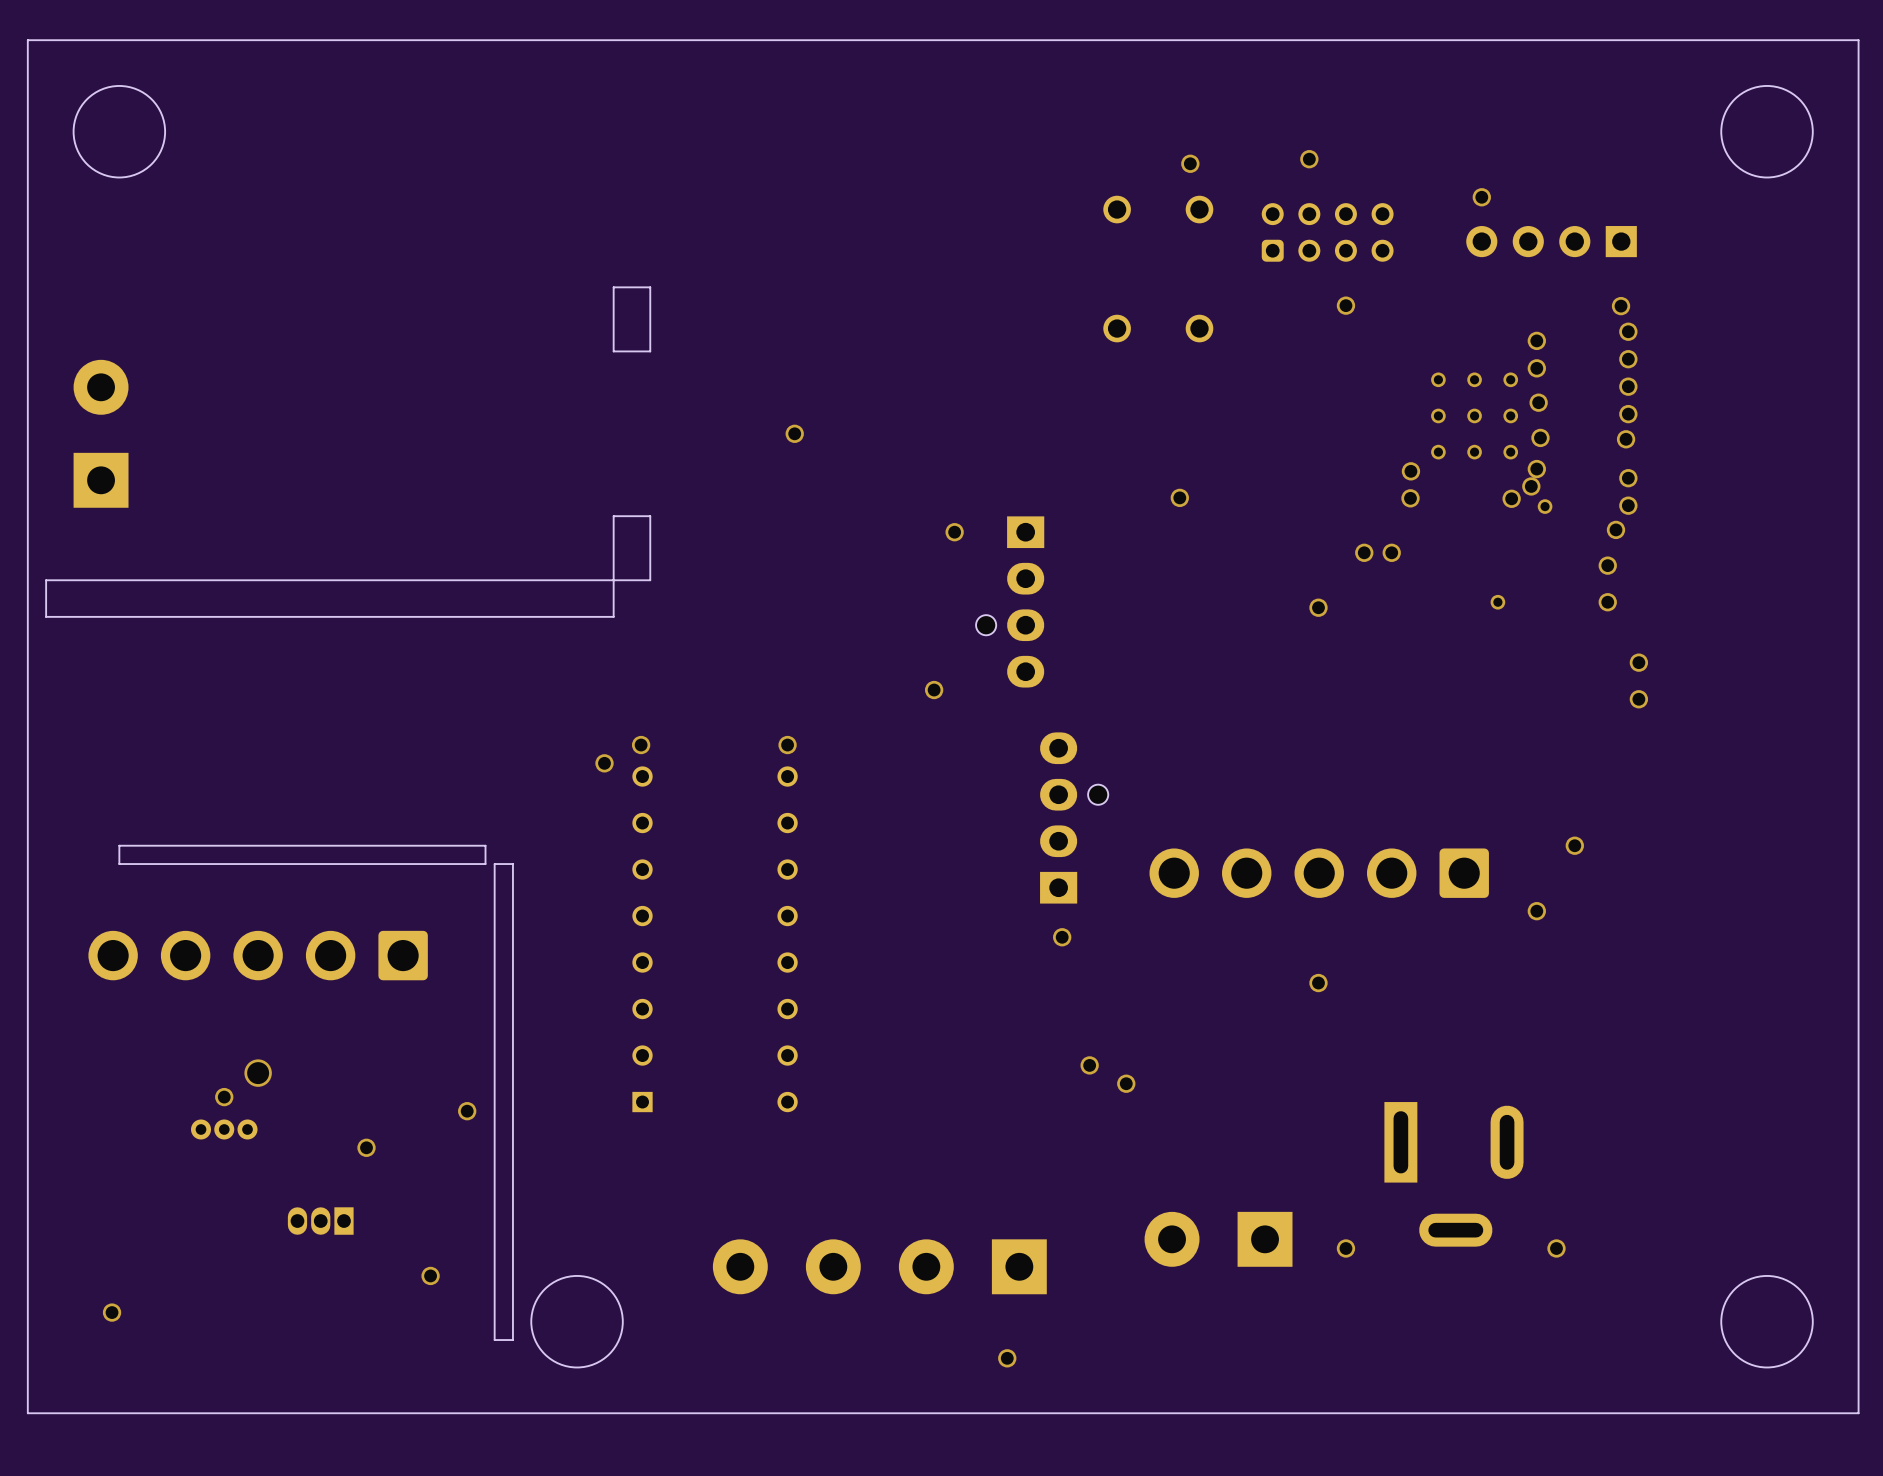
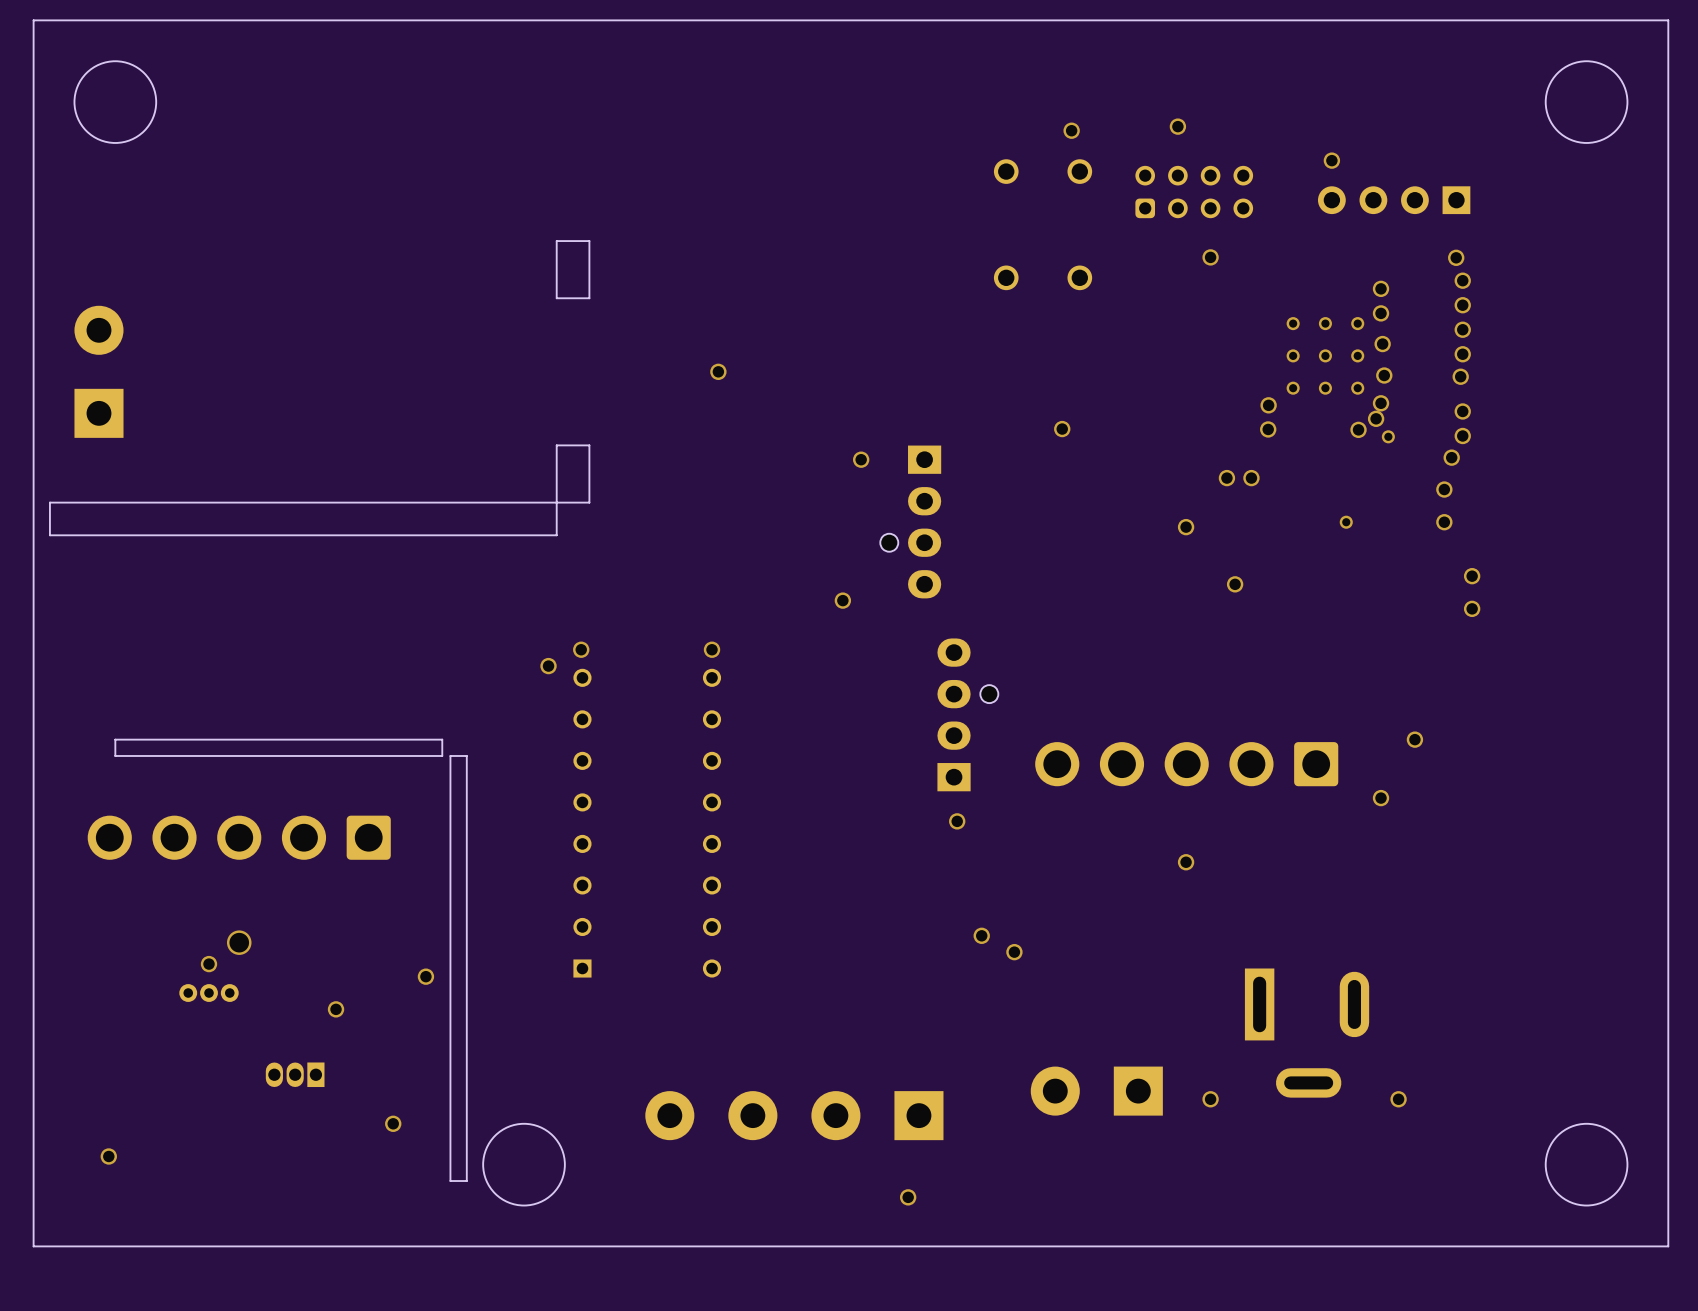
via: none -> (1235, 584)

